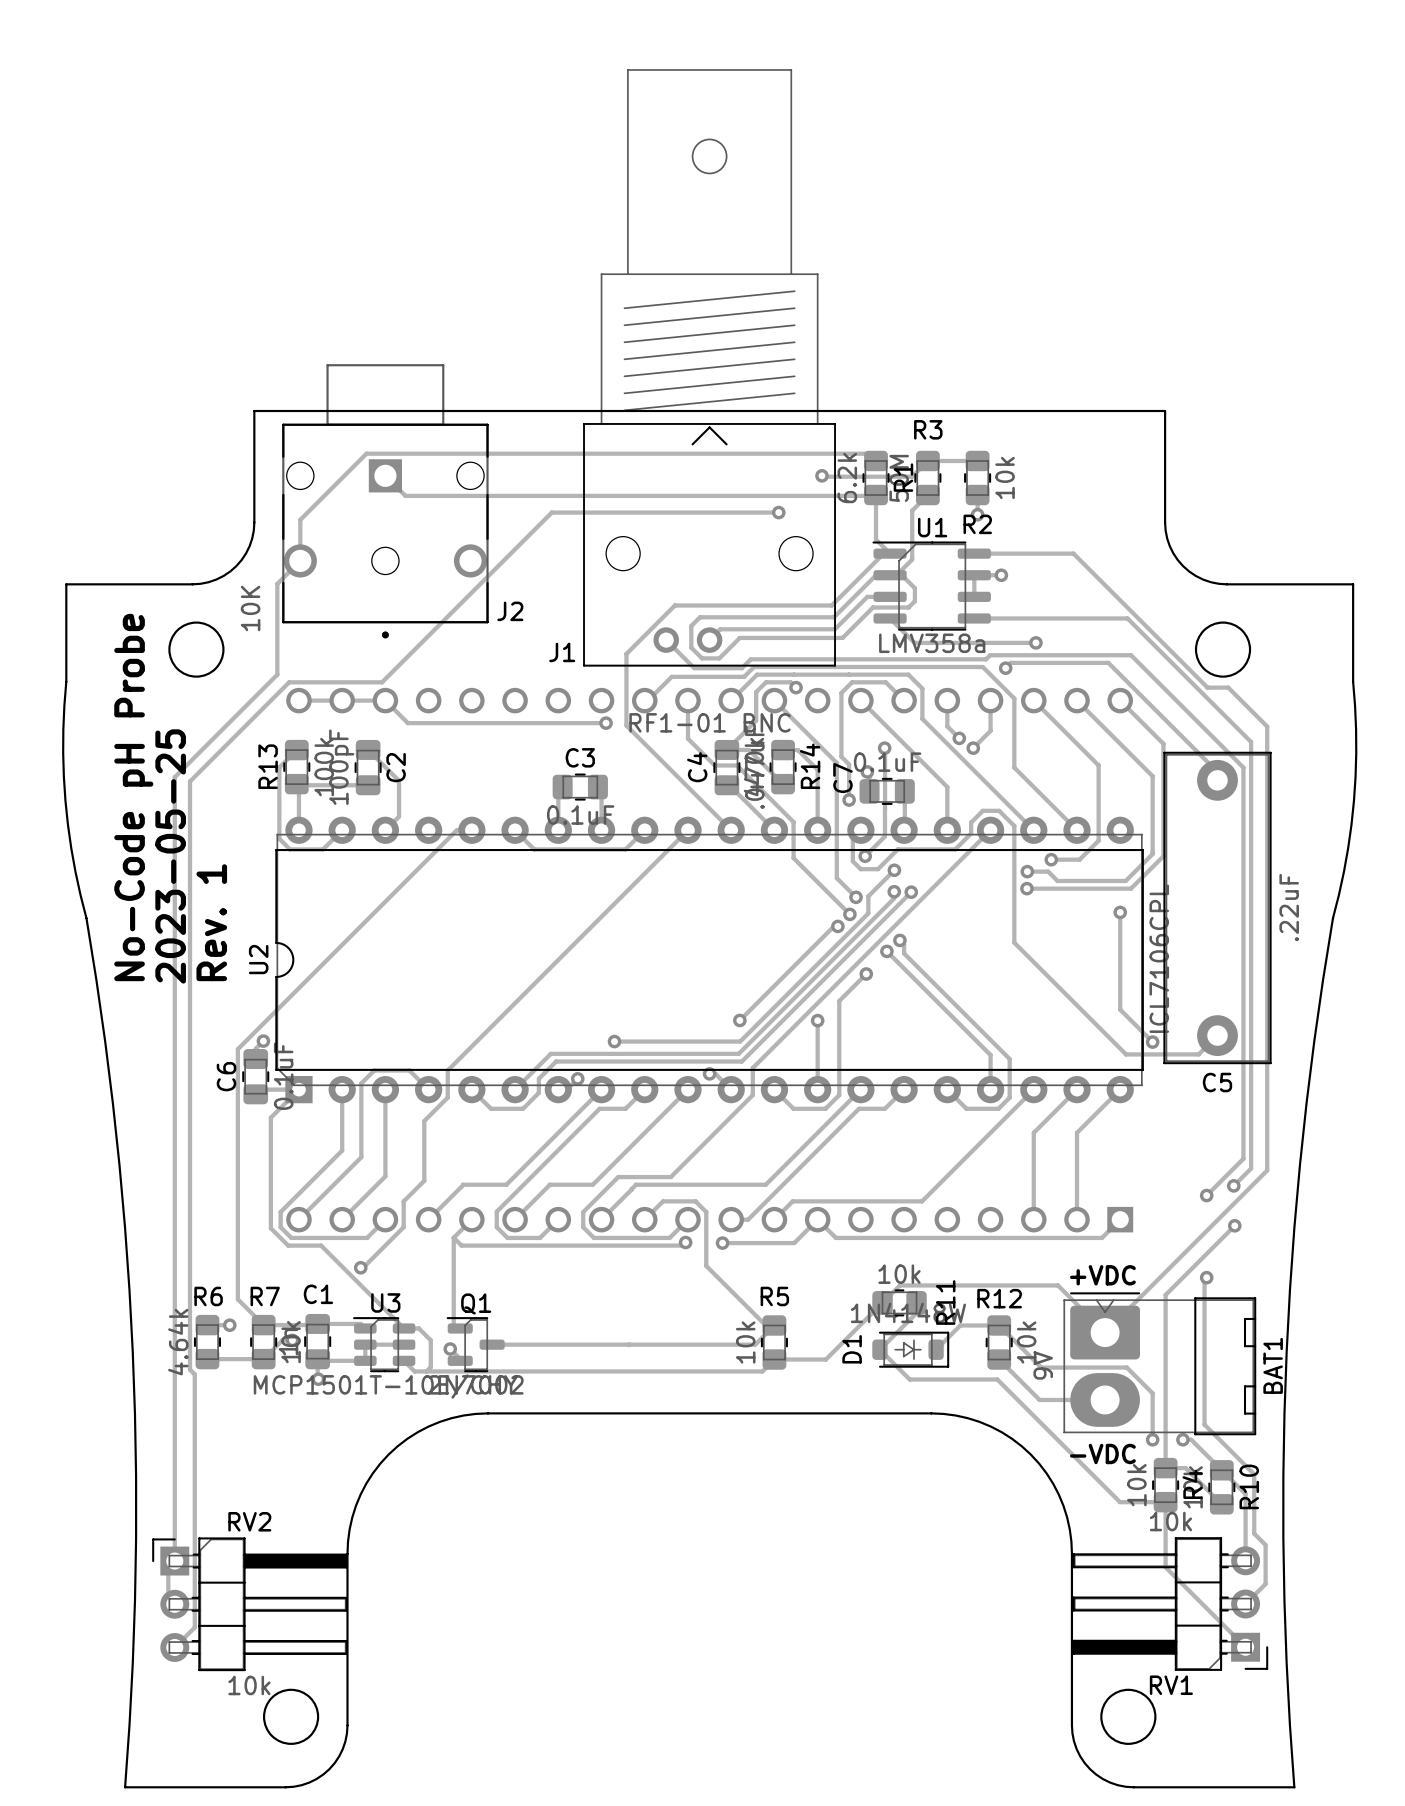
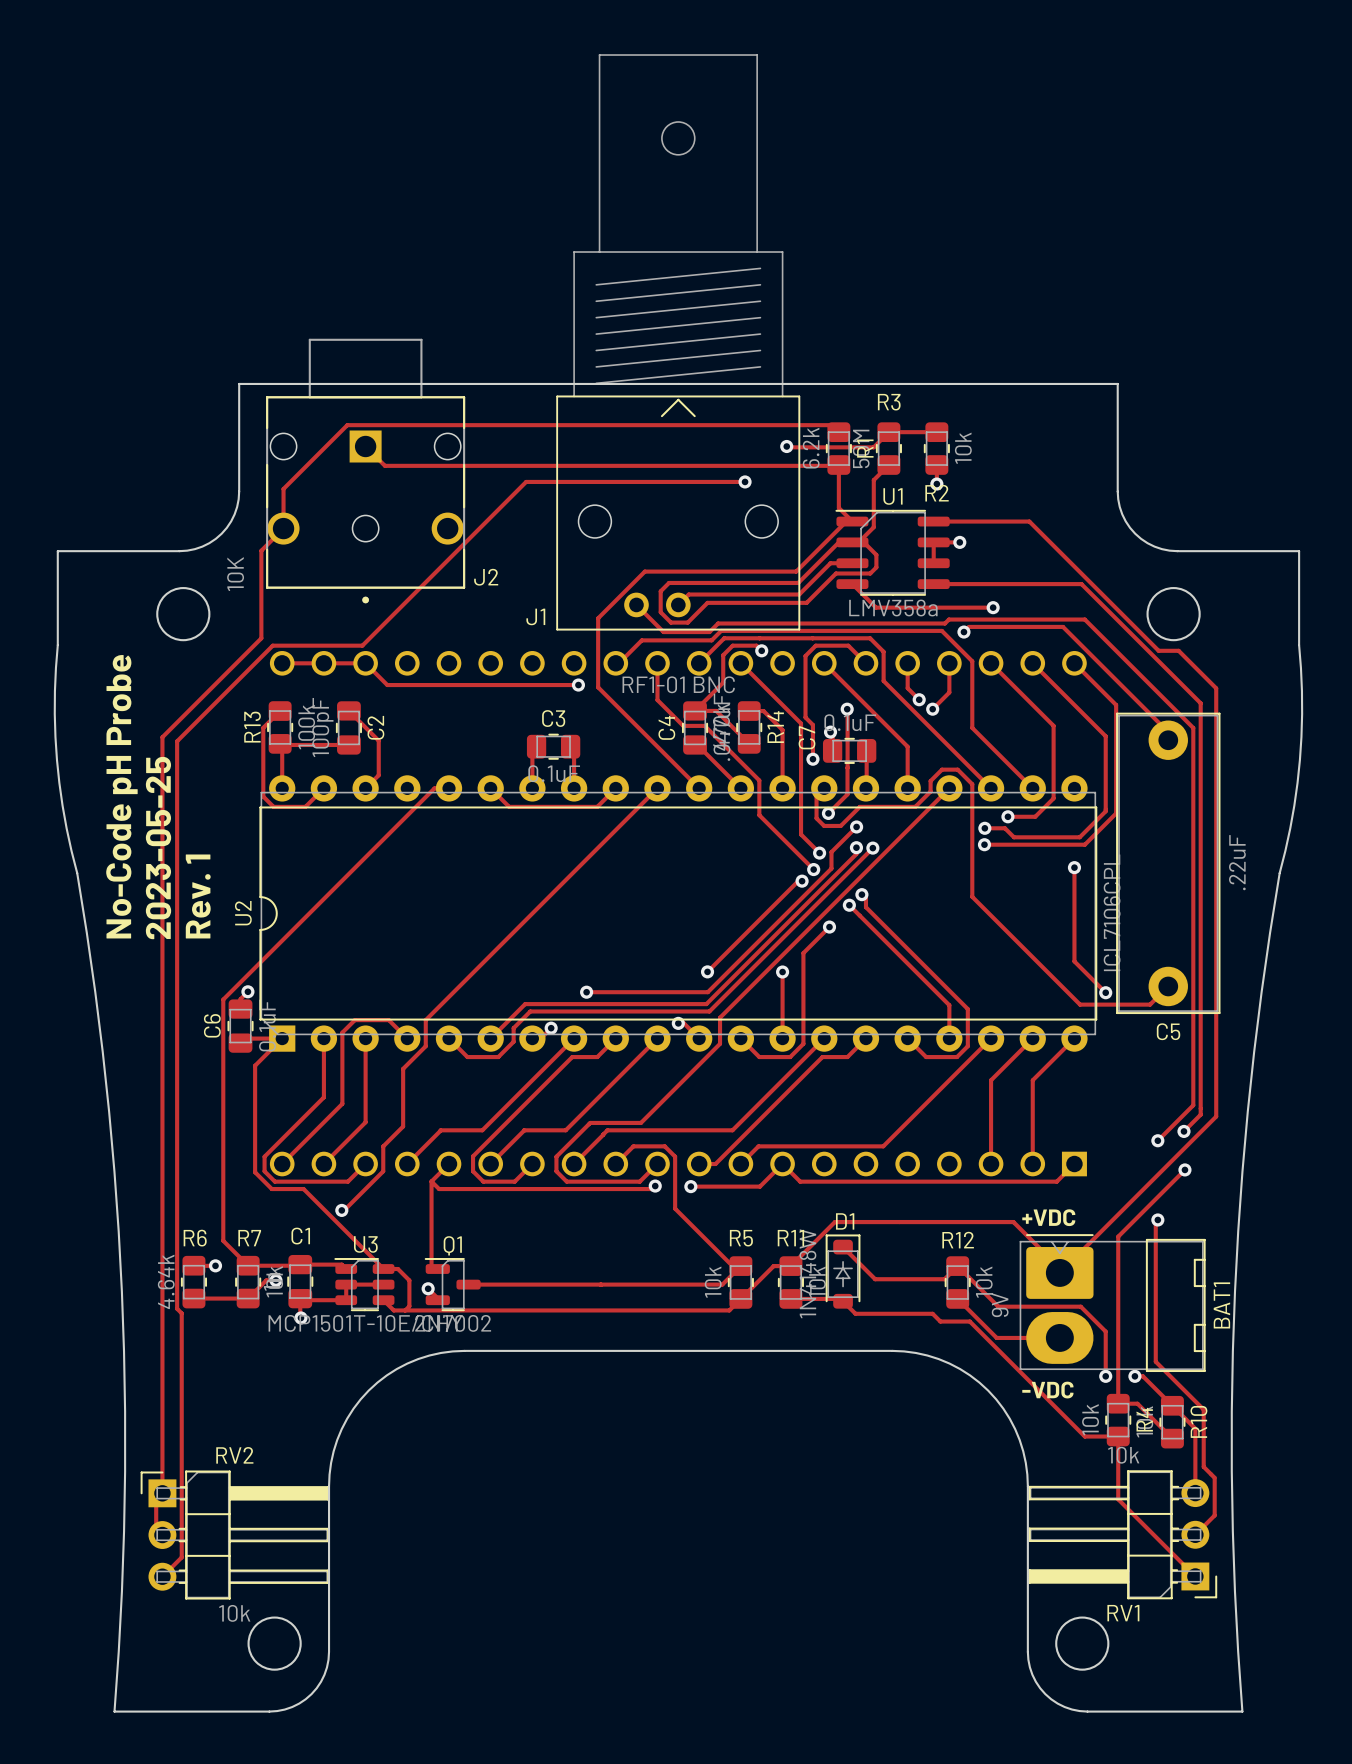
track: (882, 1302) (825, 1359) (774, 1359) -> none
track: (890, 1302) (890, 1295) (899, 1285) (1057, 1285) (1105, 1332) -> (740, 1298) (773, 1266) (790, 1266) (834, 1222) (1013, 1222) (1059, 1268) (1059, 1272)
R11 rotation: 0° (899, 1302) -> 90° clockwise (790, 1282)
R11 position: (899, 1302) -> (790, 1282)
track: (916, 1302) (916, 1313) (879, 1349) (909, 1379) (997, 1379) (1120, 1502) (1131, 1502) -> (790, 1298) (842, 1298) (855, 1313) (932, 1313) (940, 1321) (969, 1321) (1084, 1436)
R11 name position: R11 (945, 1302) -> R11 (790, 1238)
track: (999, 1325) (960, 1325) (936, 1349) -> (957, 1266) (944, 1279) (875, 1279) (843, 1247)
D1 name position: D1 (852, 1349) -> D1 (845, 1221)
D1 rotation: 0° (910, 1349) -> 90° counterclockwise (843, 1271)

